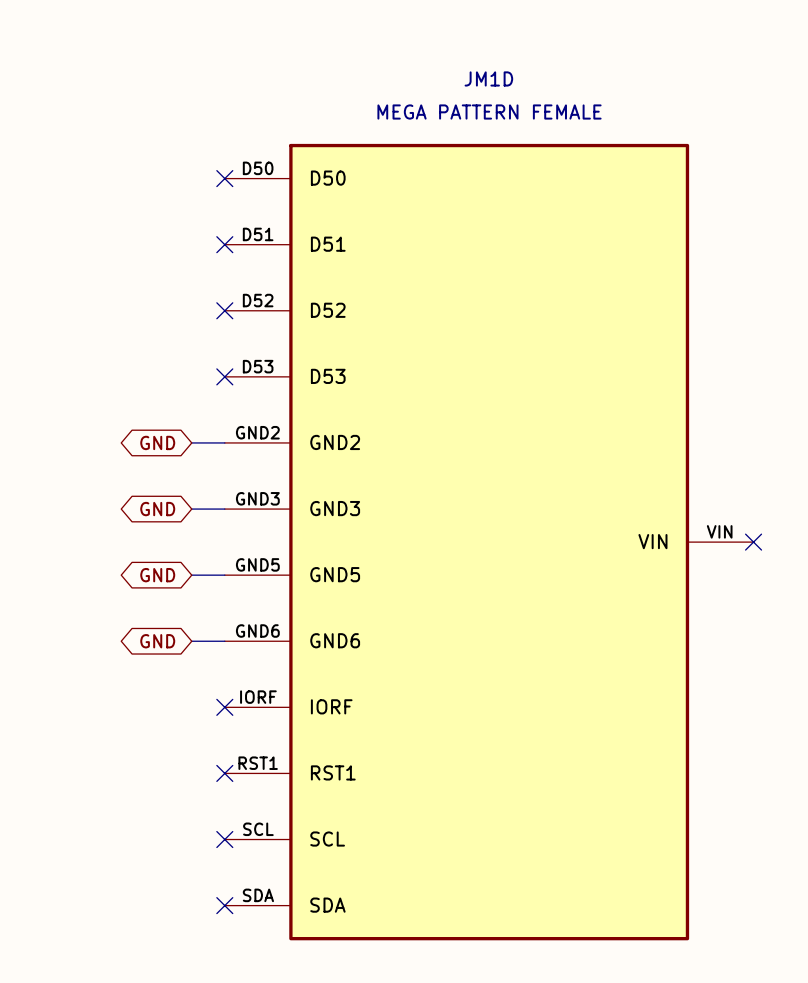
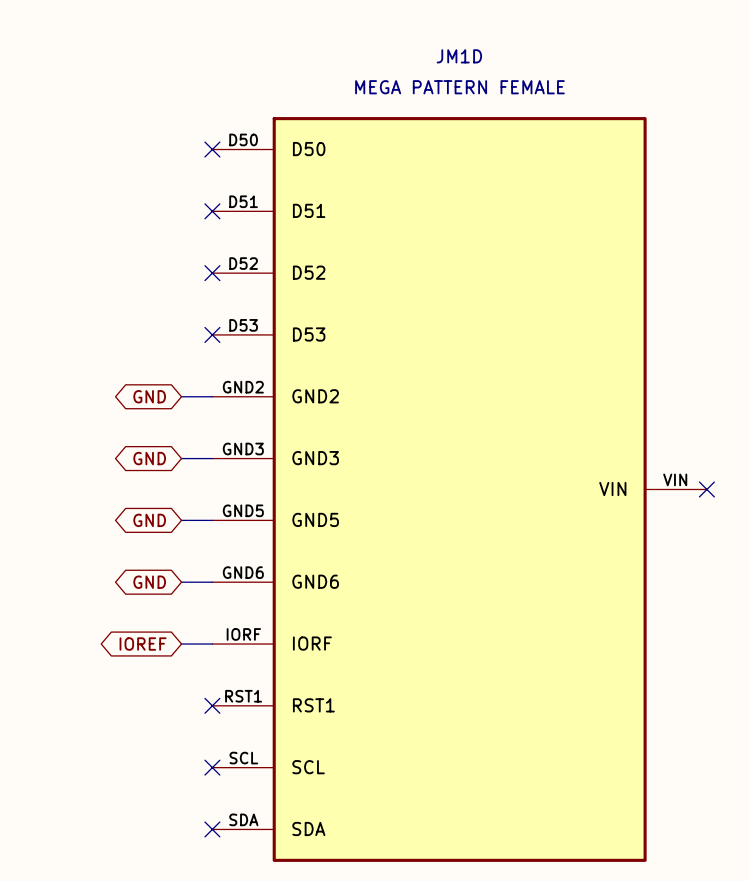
global label: none -> IOREF (143, 644)
wire: none -> (181, 644) (212, 644)
no-connect mark: (224, 707) -> none

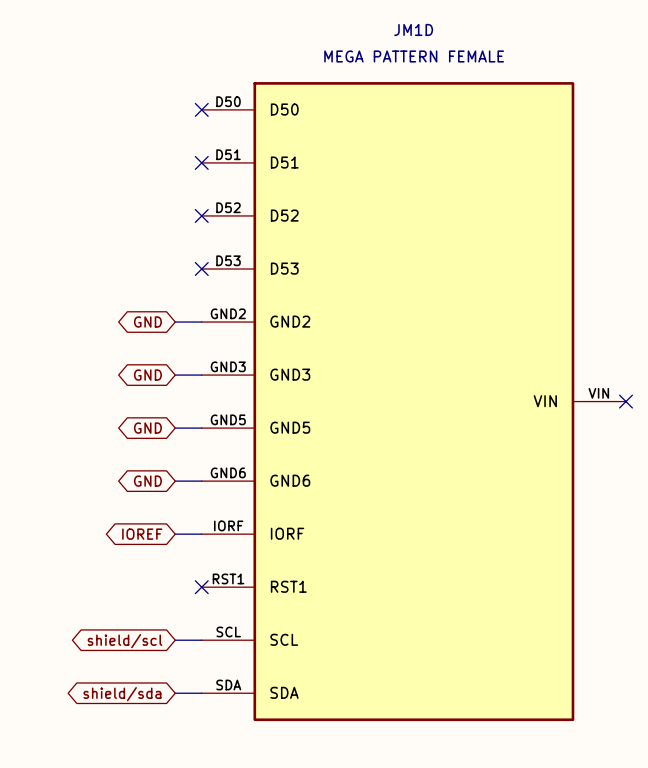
wire: none -> (175, 640) (201, 640)
no-connect mark: (212, 767) -> none
global label: none -> shield/scl (125, 641)
wire: none -> (175, 693) (201, 693)
no-connect mark: (212, 829) -> none
global label: none -> shield/sda (122, 694)

